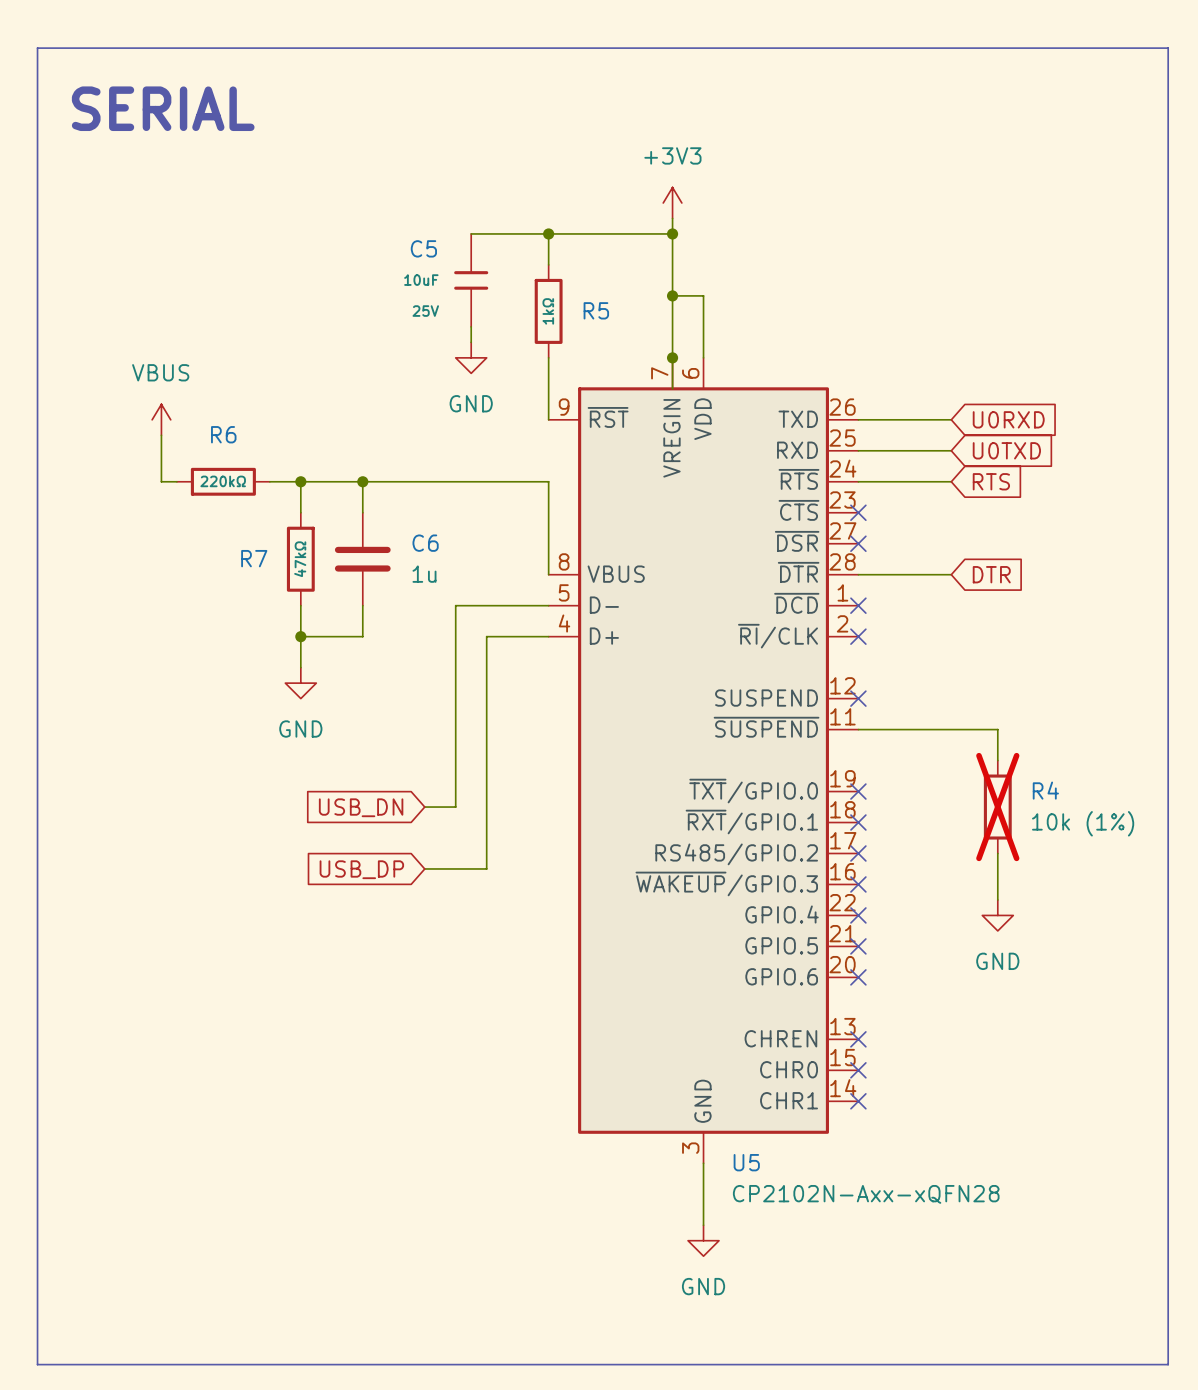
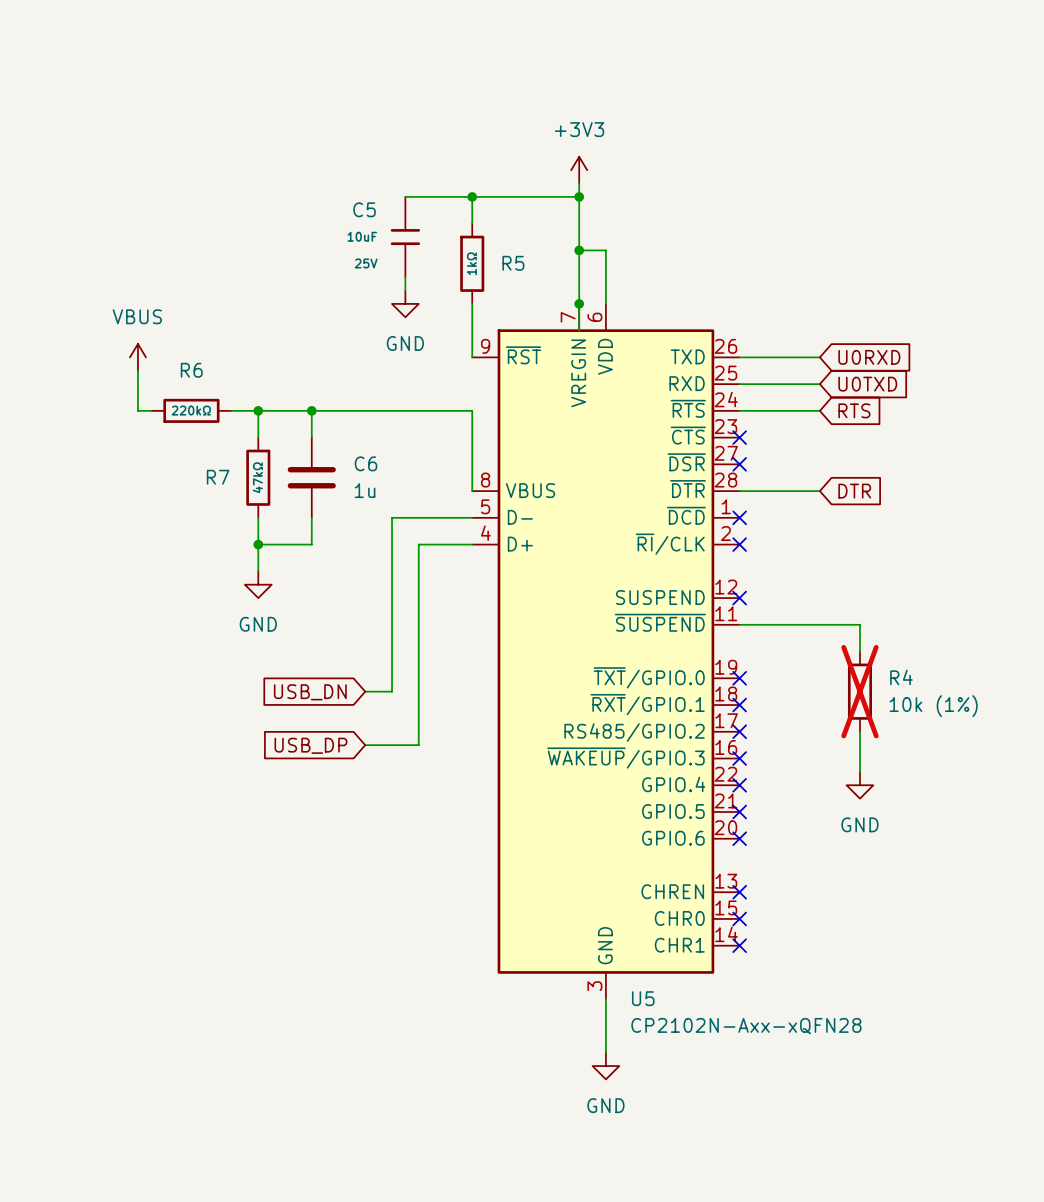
line: (37, 48) (1168, 48) (1168, 1364) (37, 1364) (37, 48) -> none
text: SERIAL (163, 108) -> none

